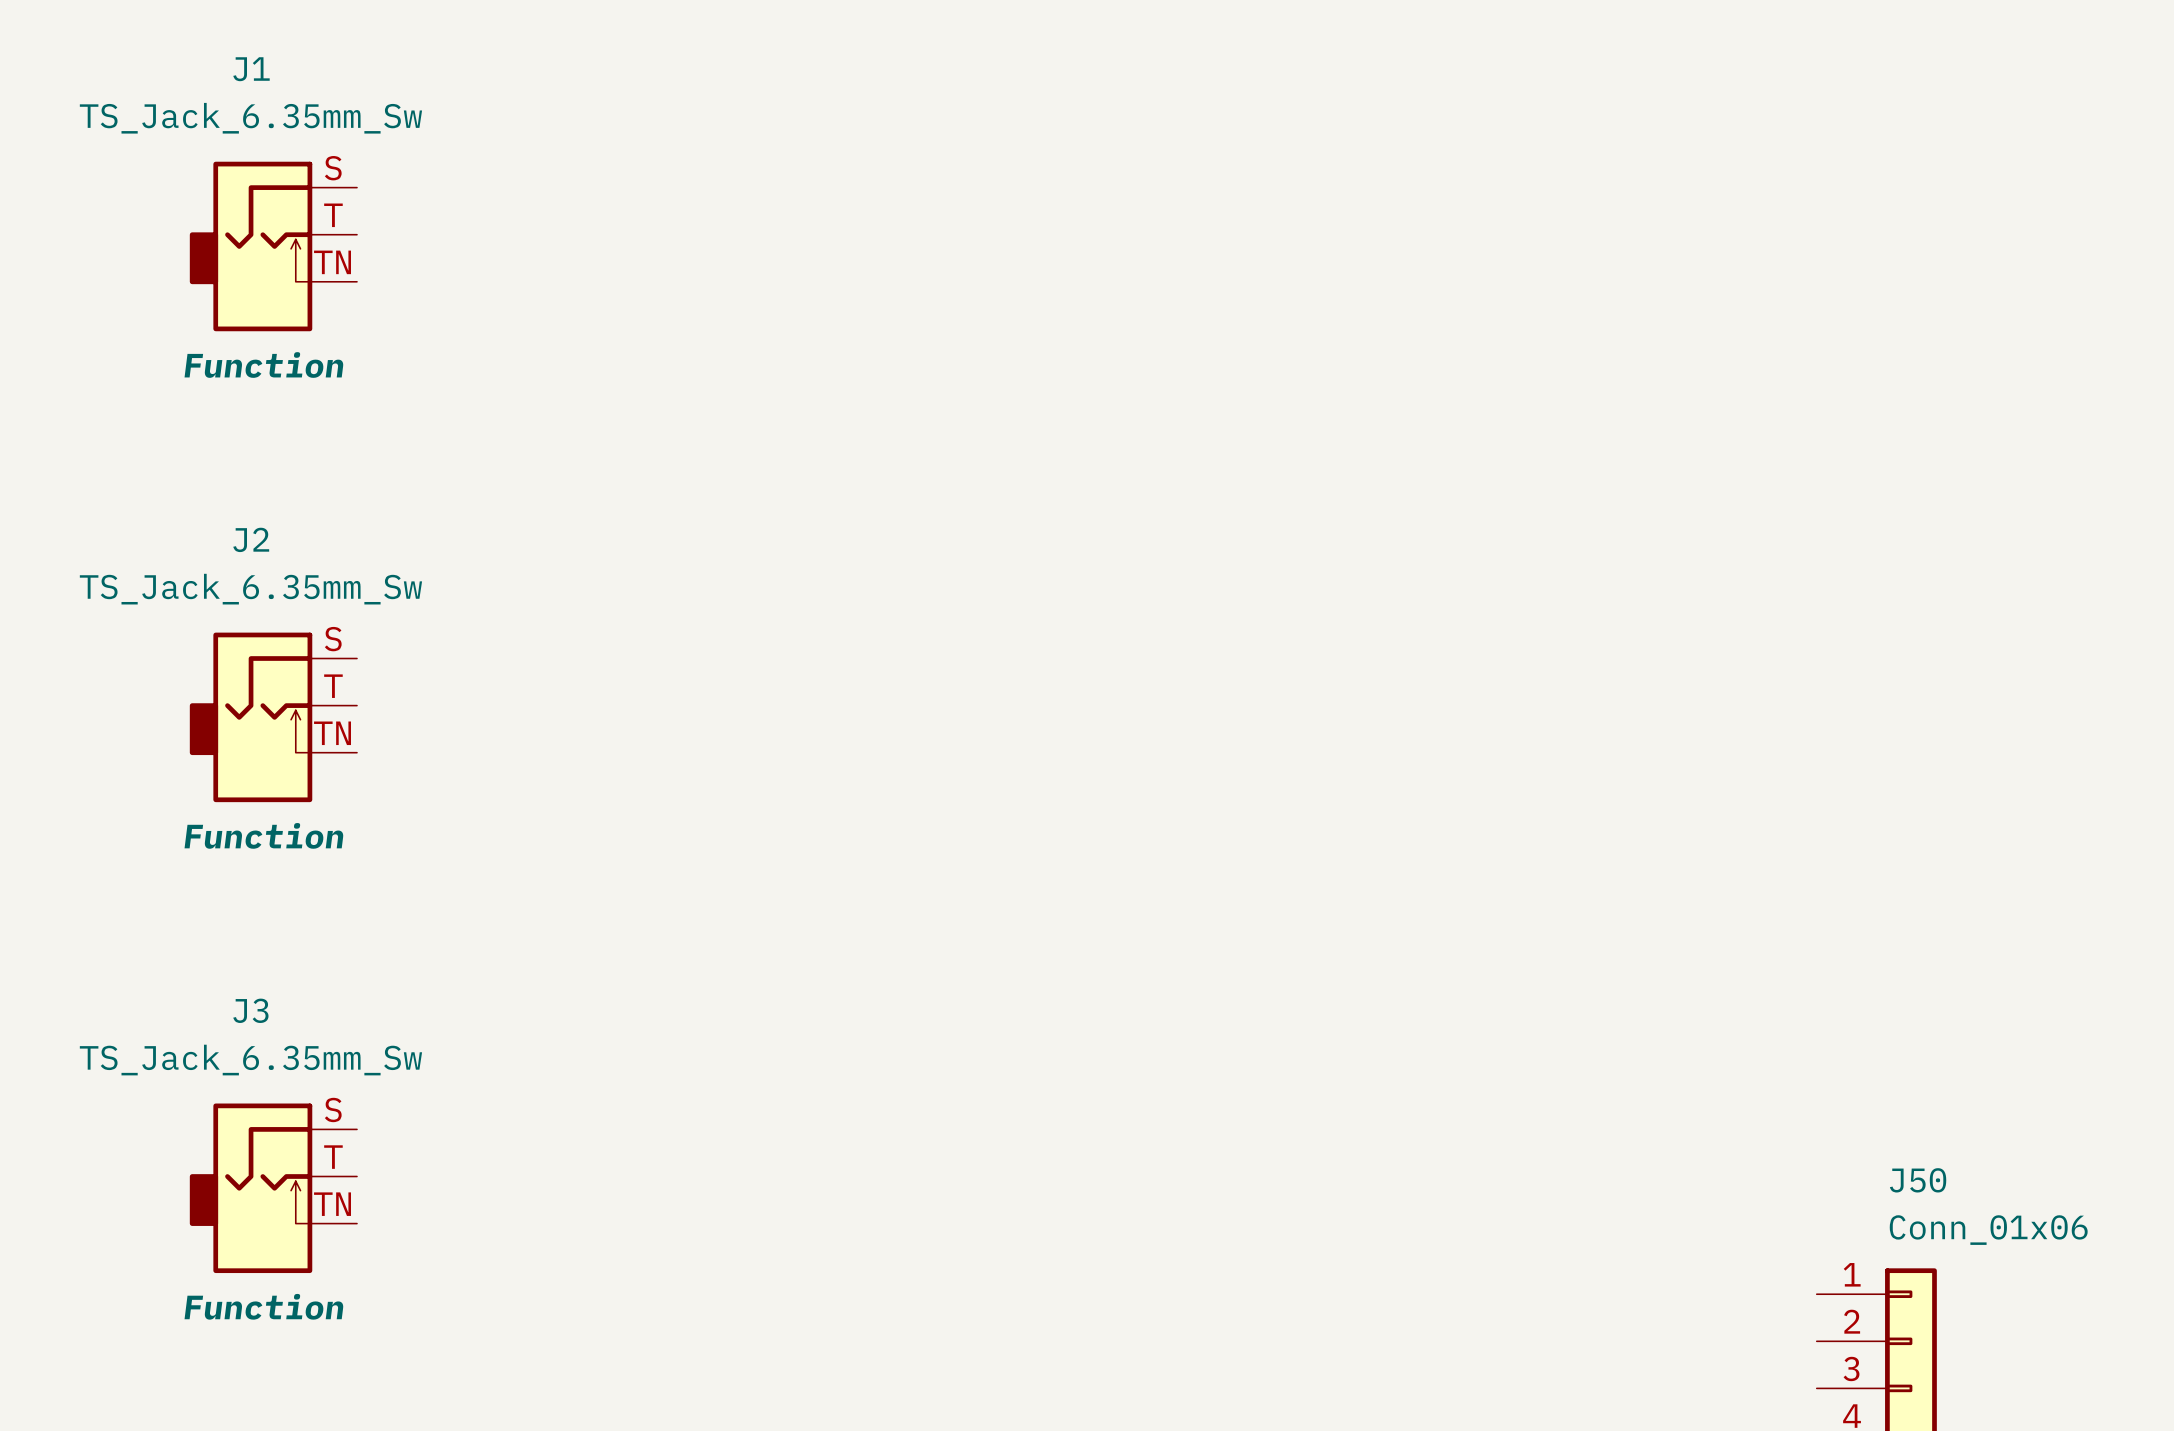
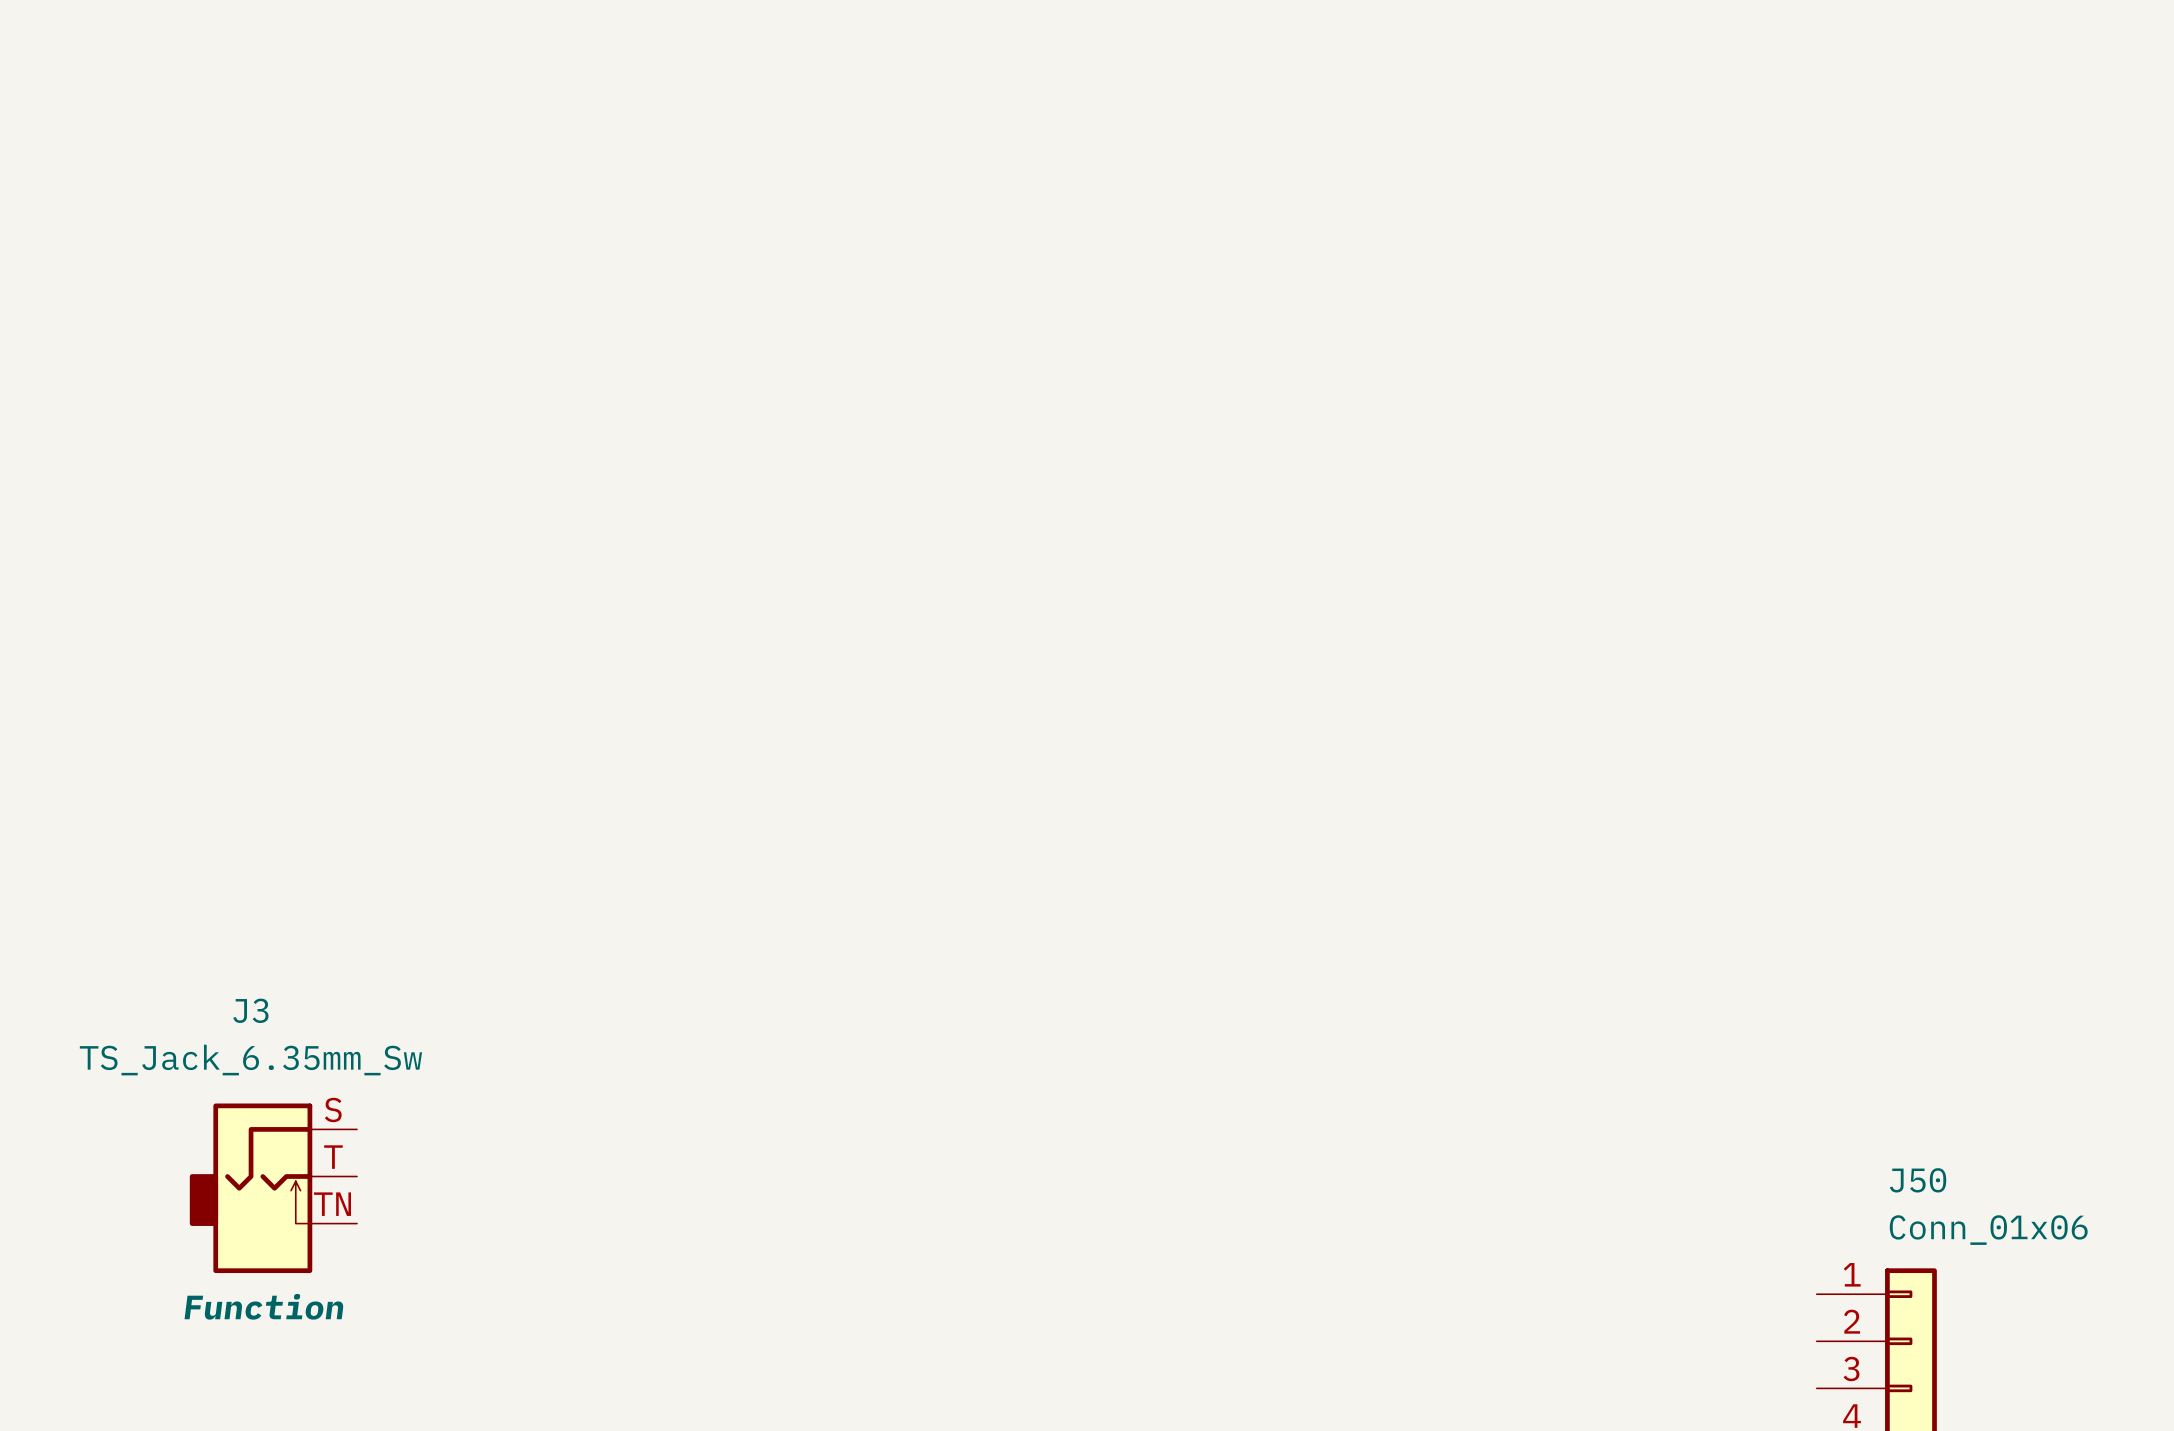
J1: TS_Jack_6.35mm_Sw (273, 246) -> none
J2: TS_Jack_6.35mm_Sw (273, 717) -> none

